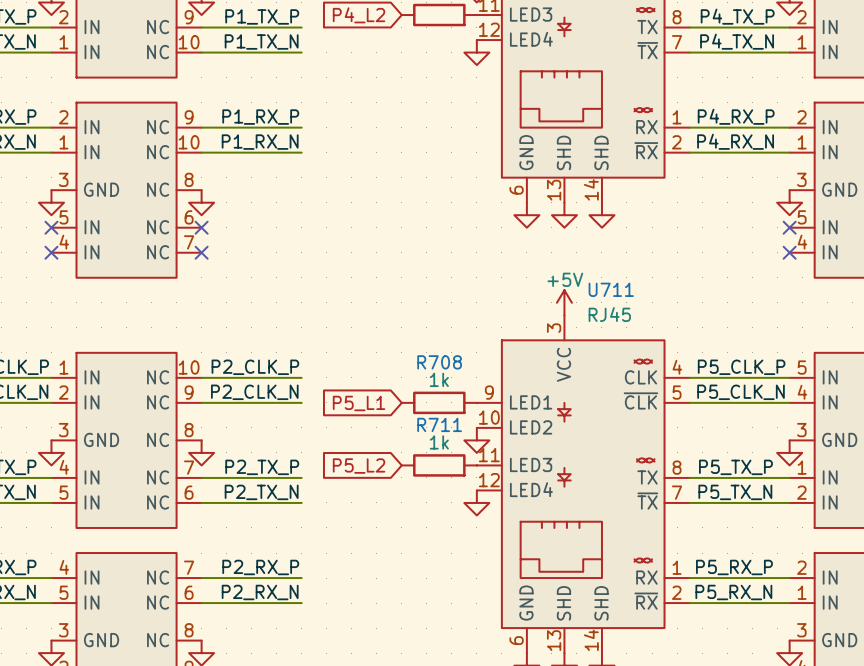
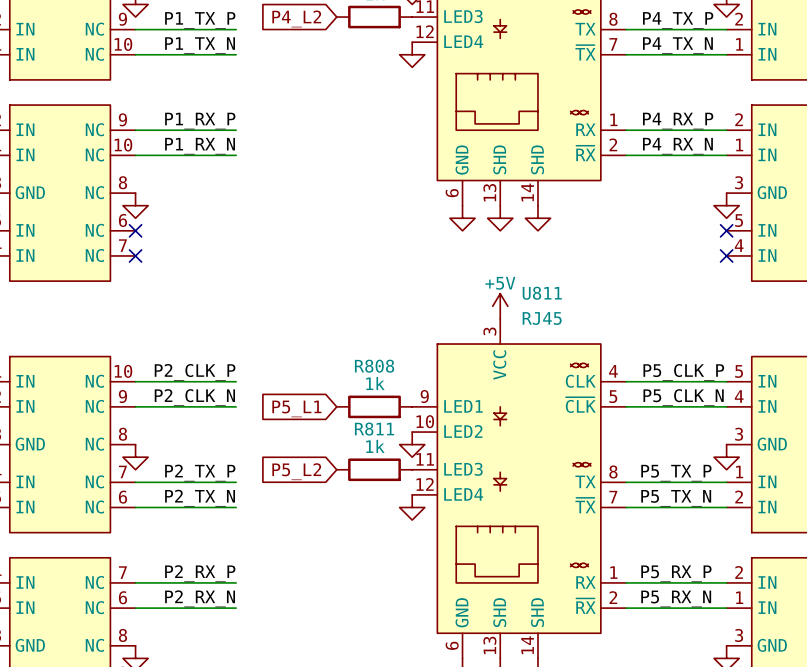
U711 name: U711 (611, 289) -> U811 (542, 293)
R708 name: R708 (439, 362) -> R808 (374, 366)
R711 name: R711 (439, 424) -> R811 (374, 429)

